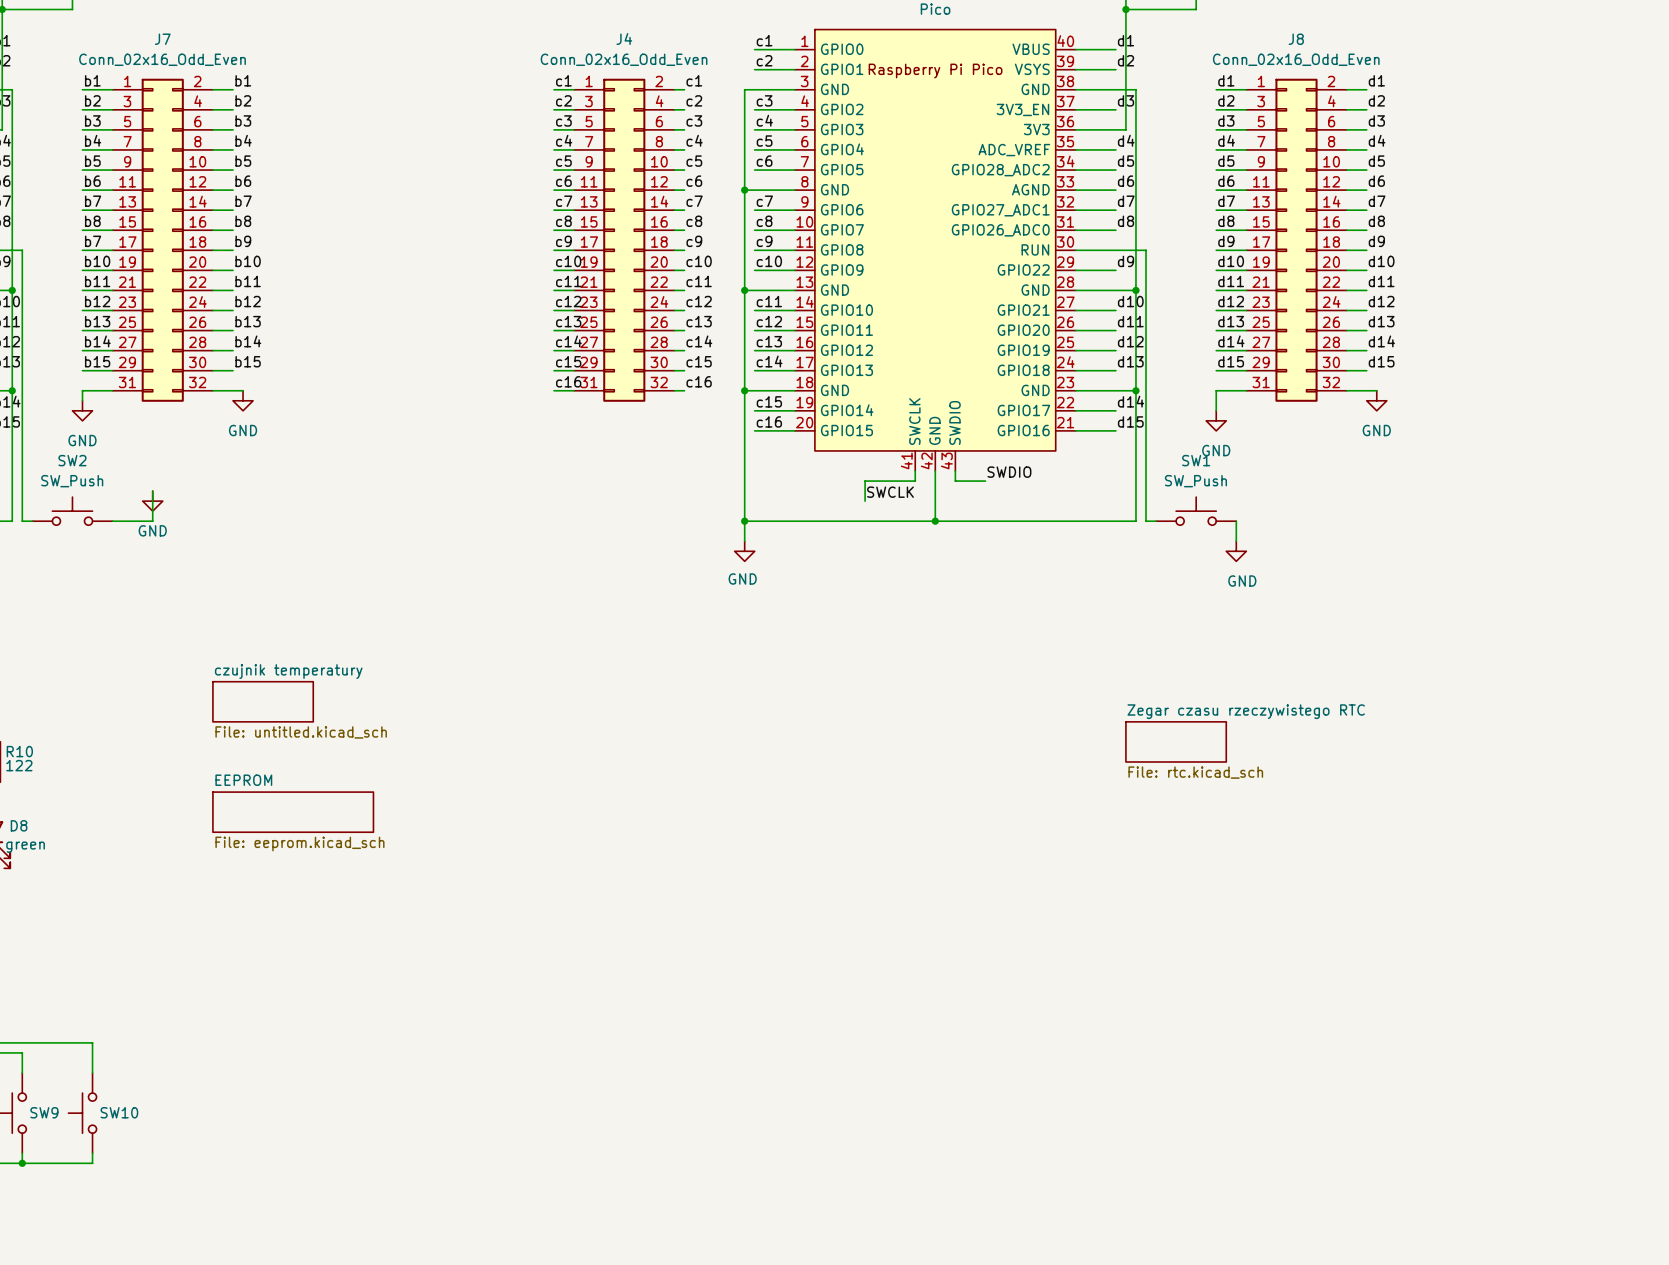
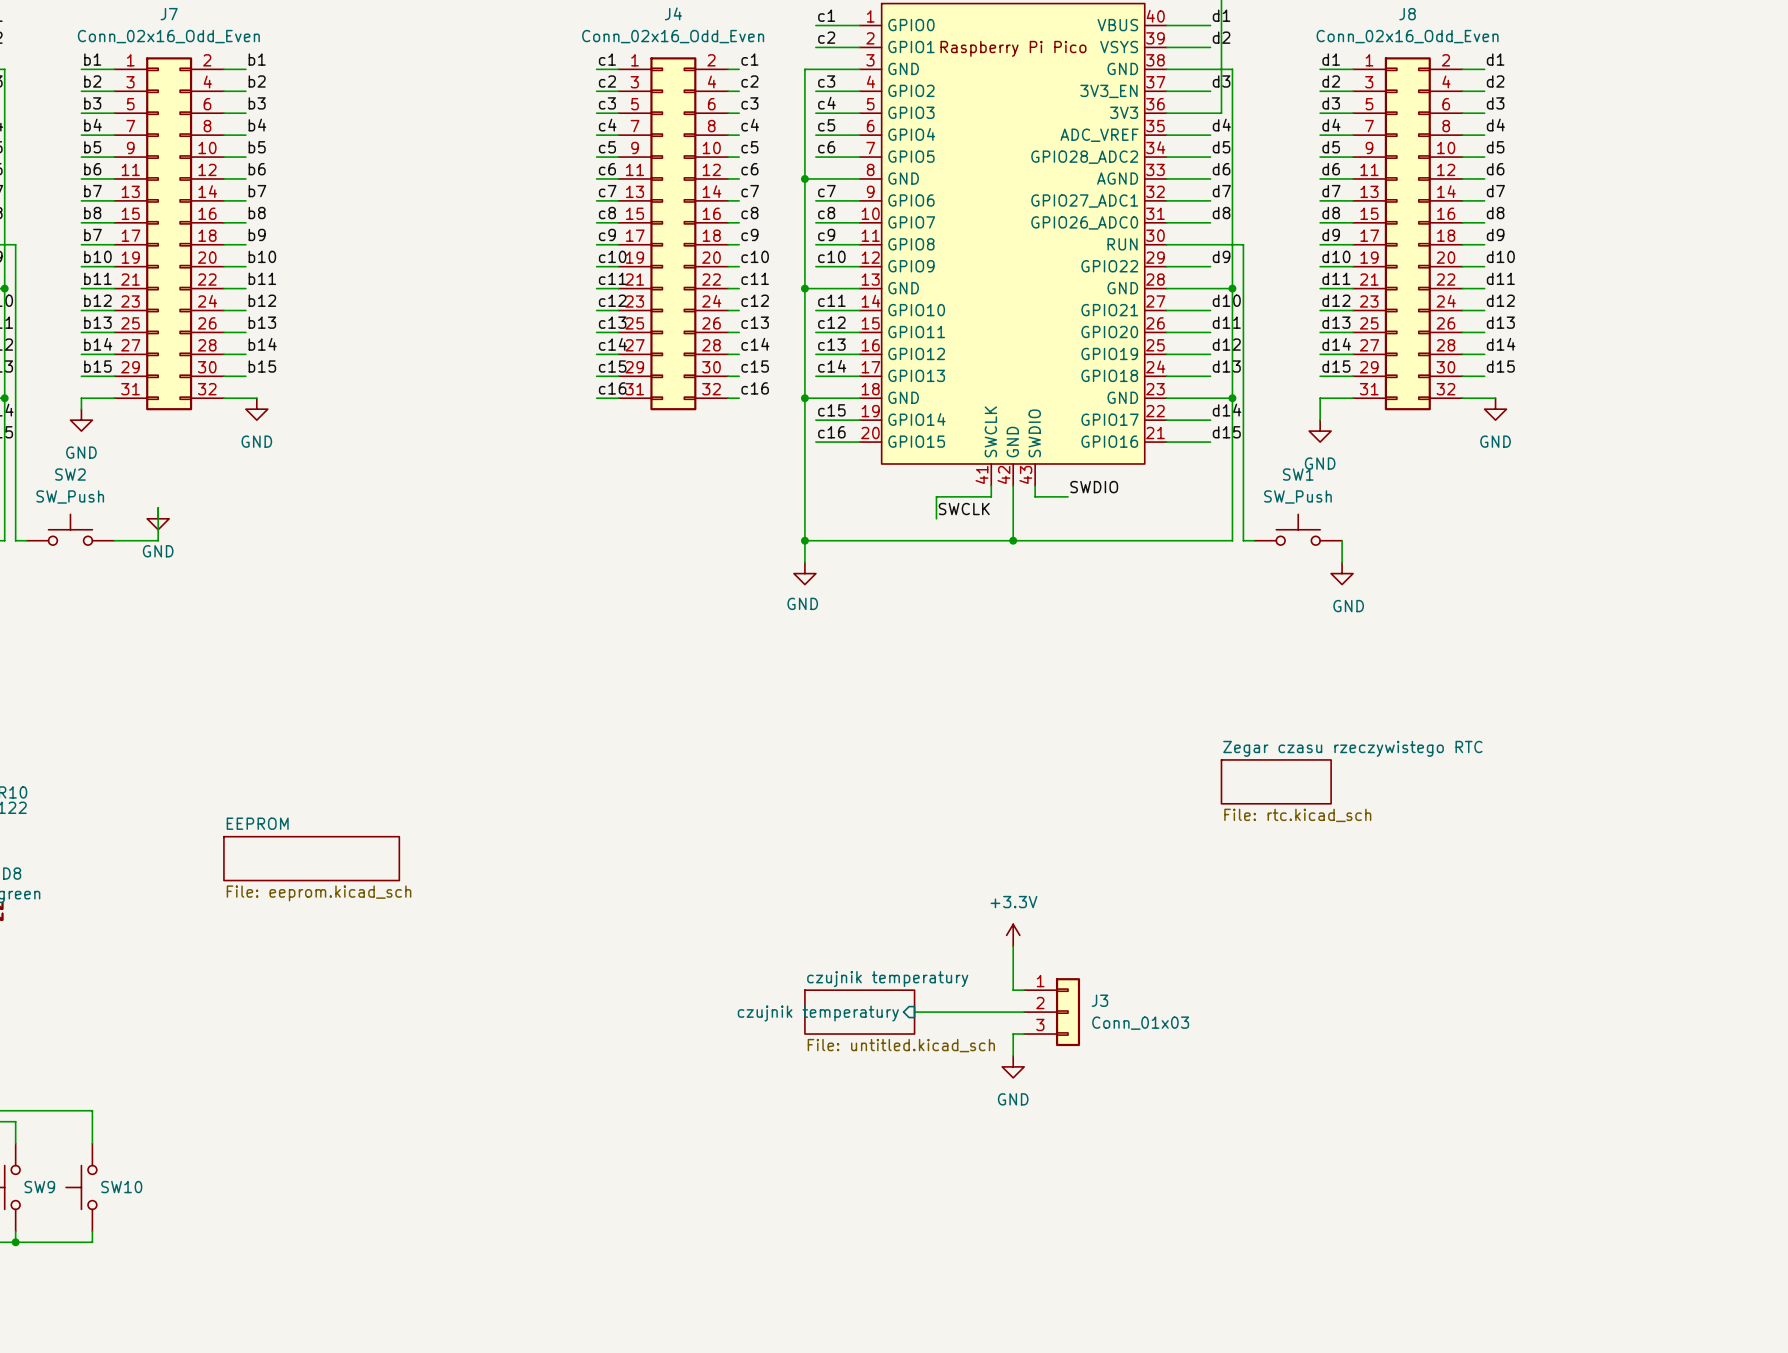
sheet czujnik temperatury: File: untitled.kicad_sch (263, 701) -> none
power symbol: none -> +3.3V (1013, 935)
wire: none -> (1013, 946) (1013, 990) (1024, 990)
sheet czujnik temperatury: none -> File: untitled.kicad_sch (859, 1012)
wire: none -> (914, 1012) (1024, 1012)
J3: none -> Conn_01x03 (1052, 1012)
sheet pin: none -> czujnik temperatury (818, 1013)
wire: none -> (1024, 1034) (1013, 1034) (1013, 1055)
power symbol: none -> GND (1013, 1066)

